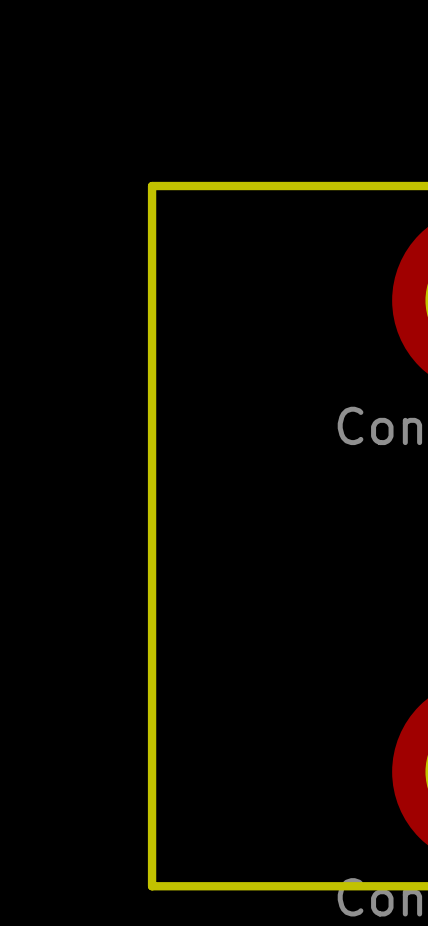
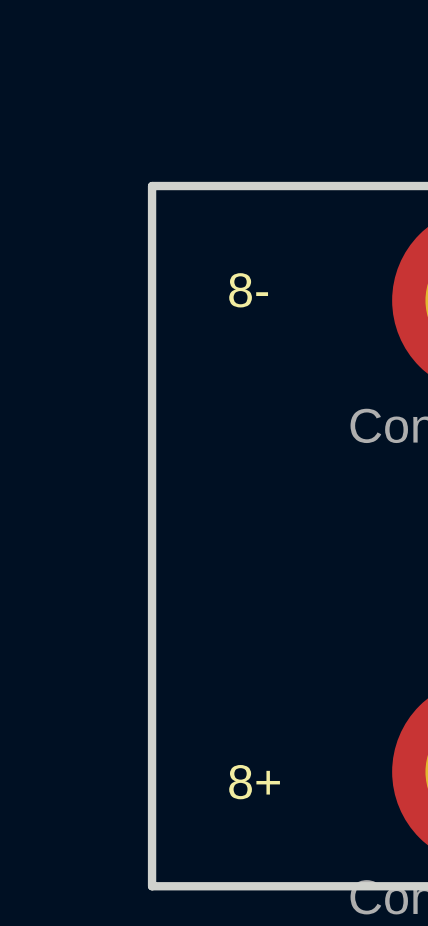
text: none -> 8- (248, 290)
text: none -> 8+ (254, 782)

